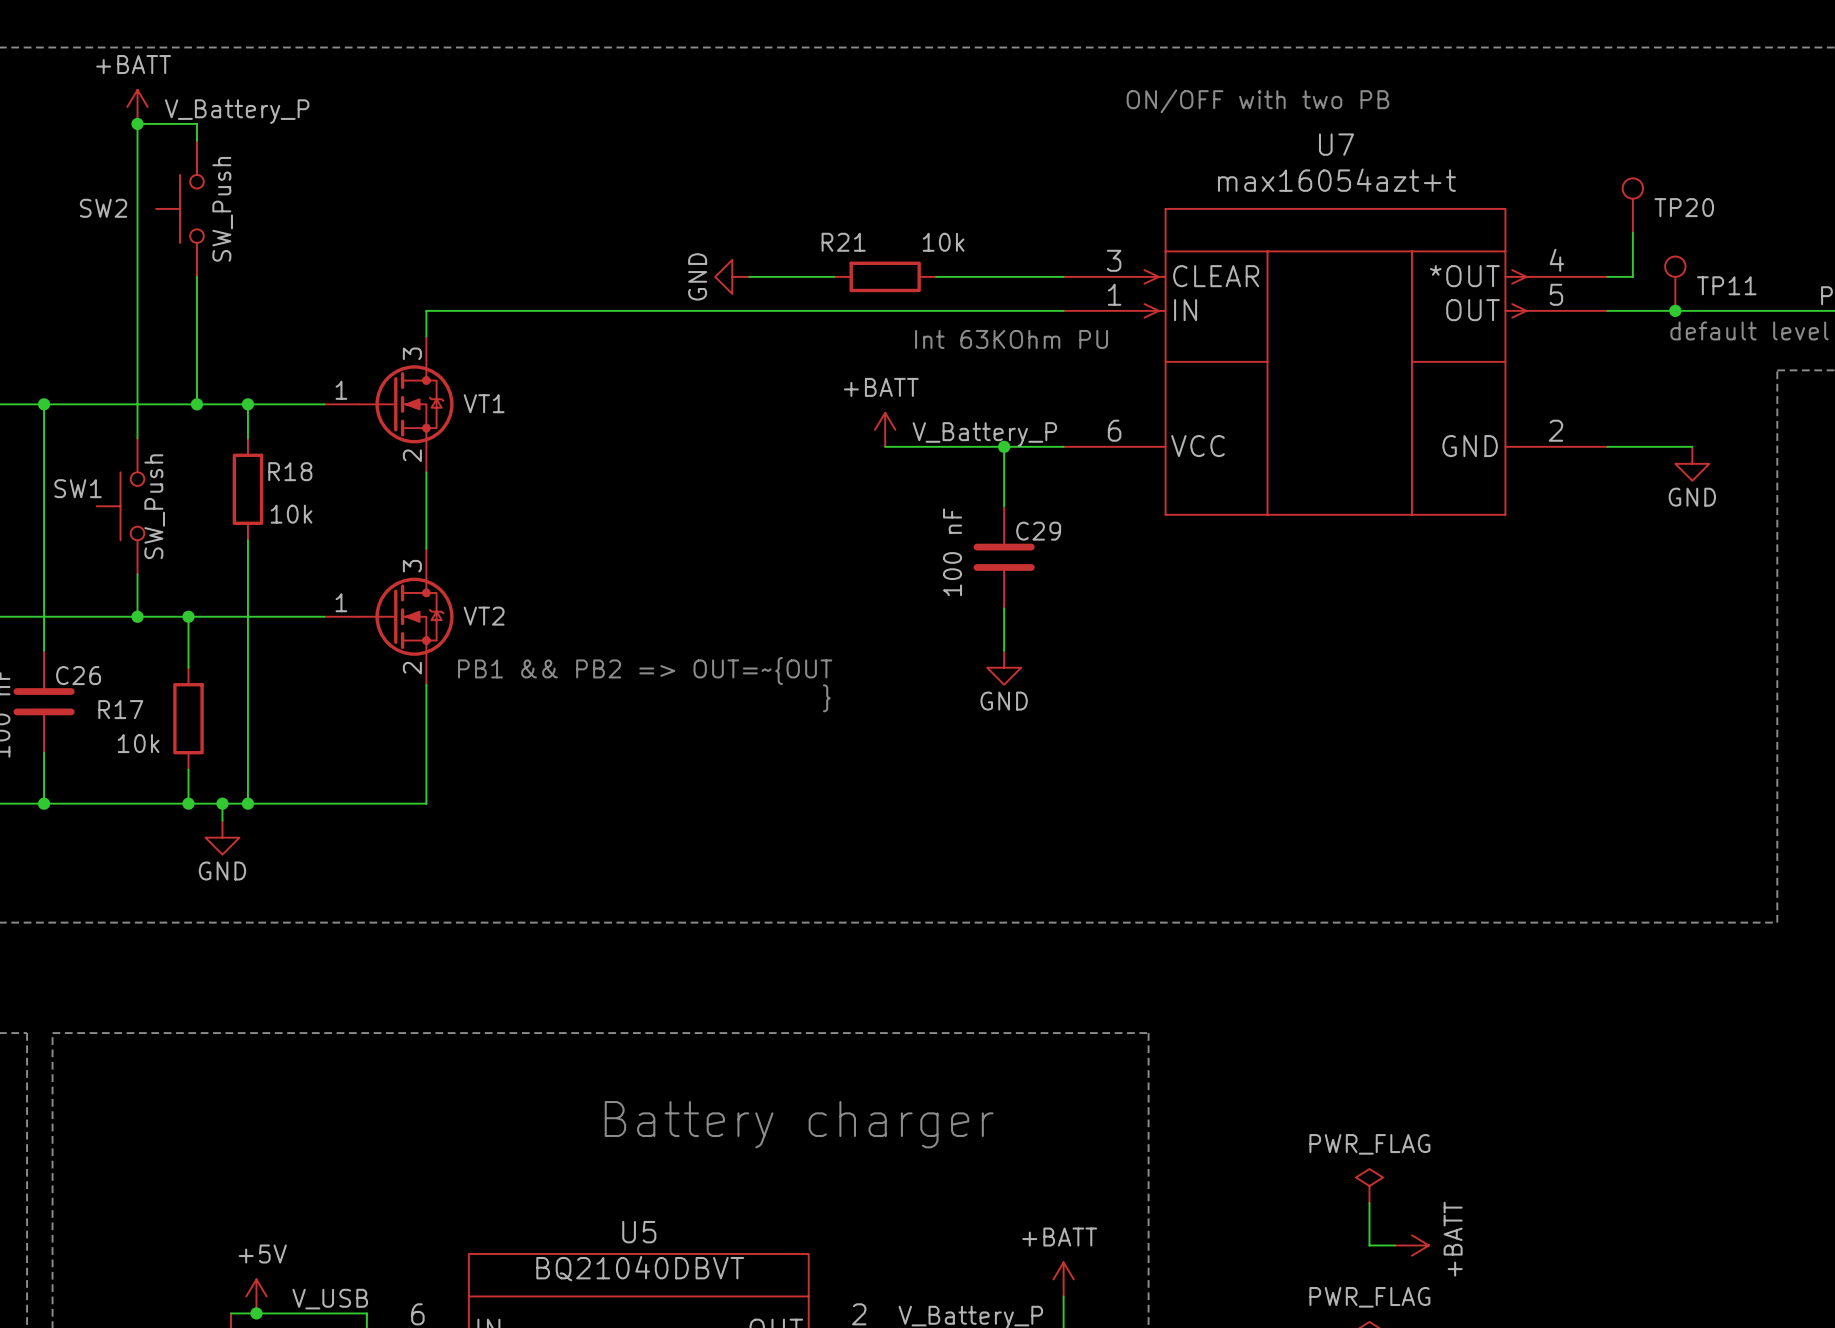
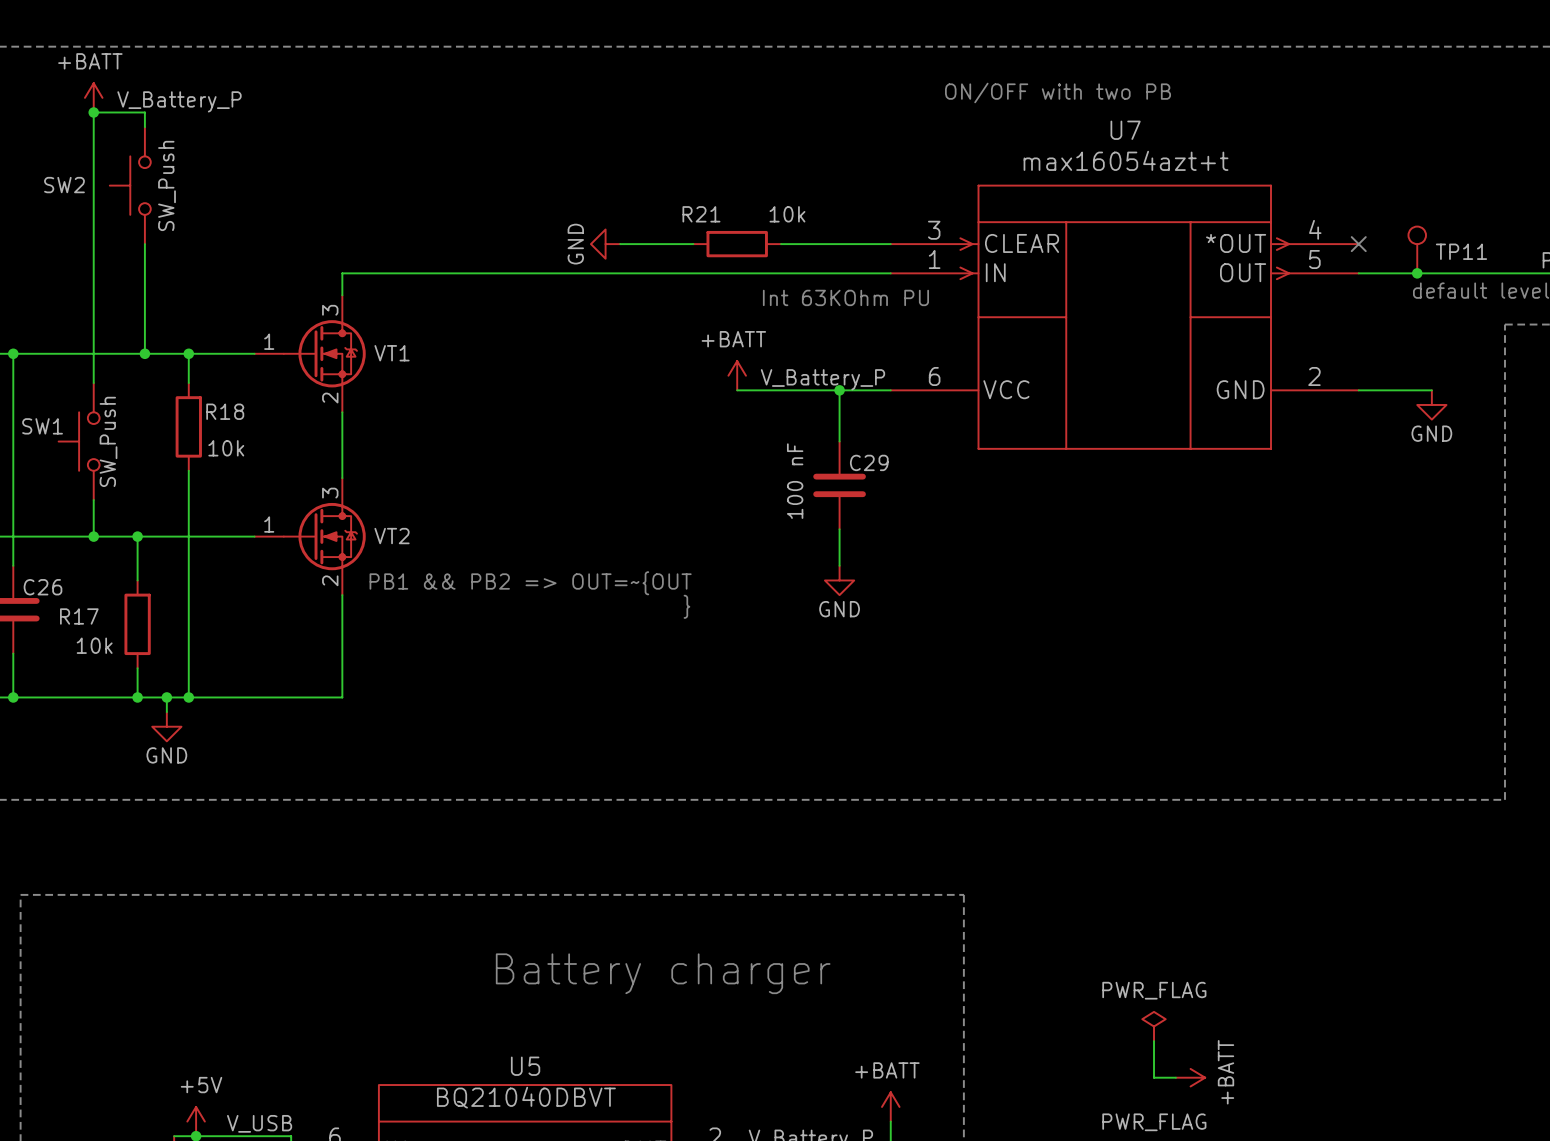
TP20: (1632, 205) -> none
wire: (1632, 232) (1632, 276) (1607, 276) -> none
no-connect mark: none -> (1358, 244)

